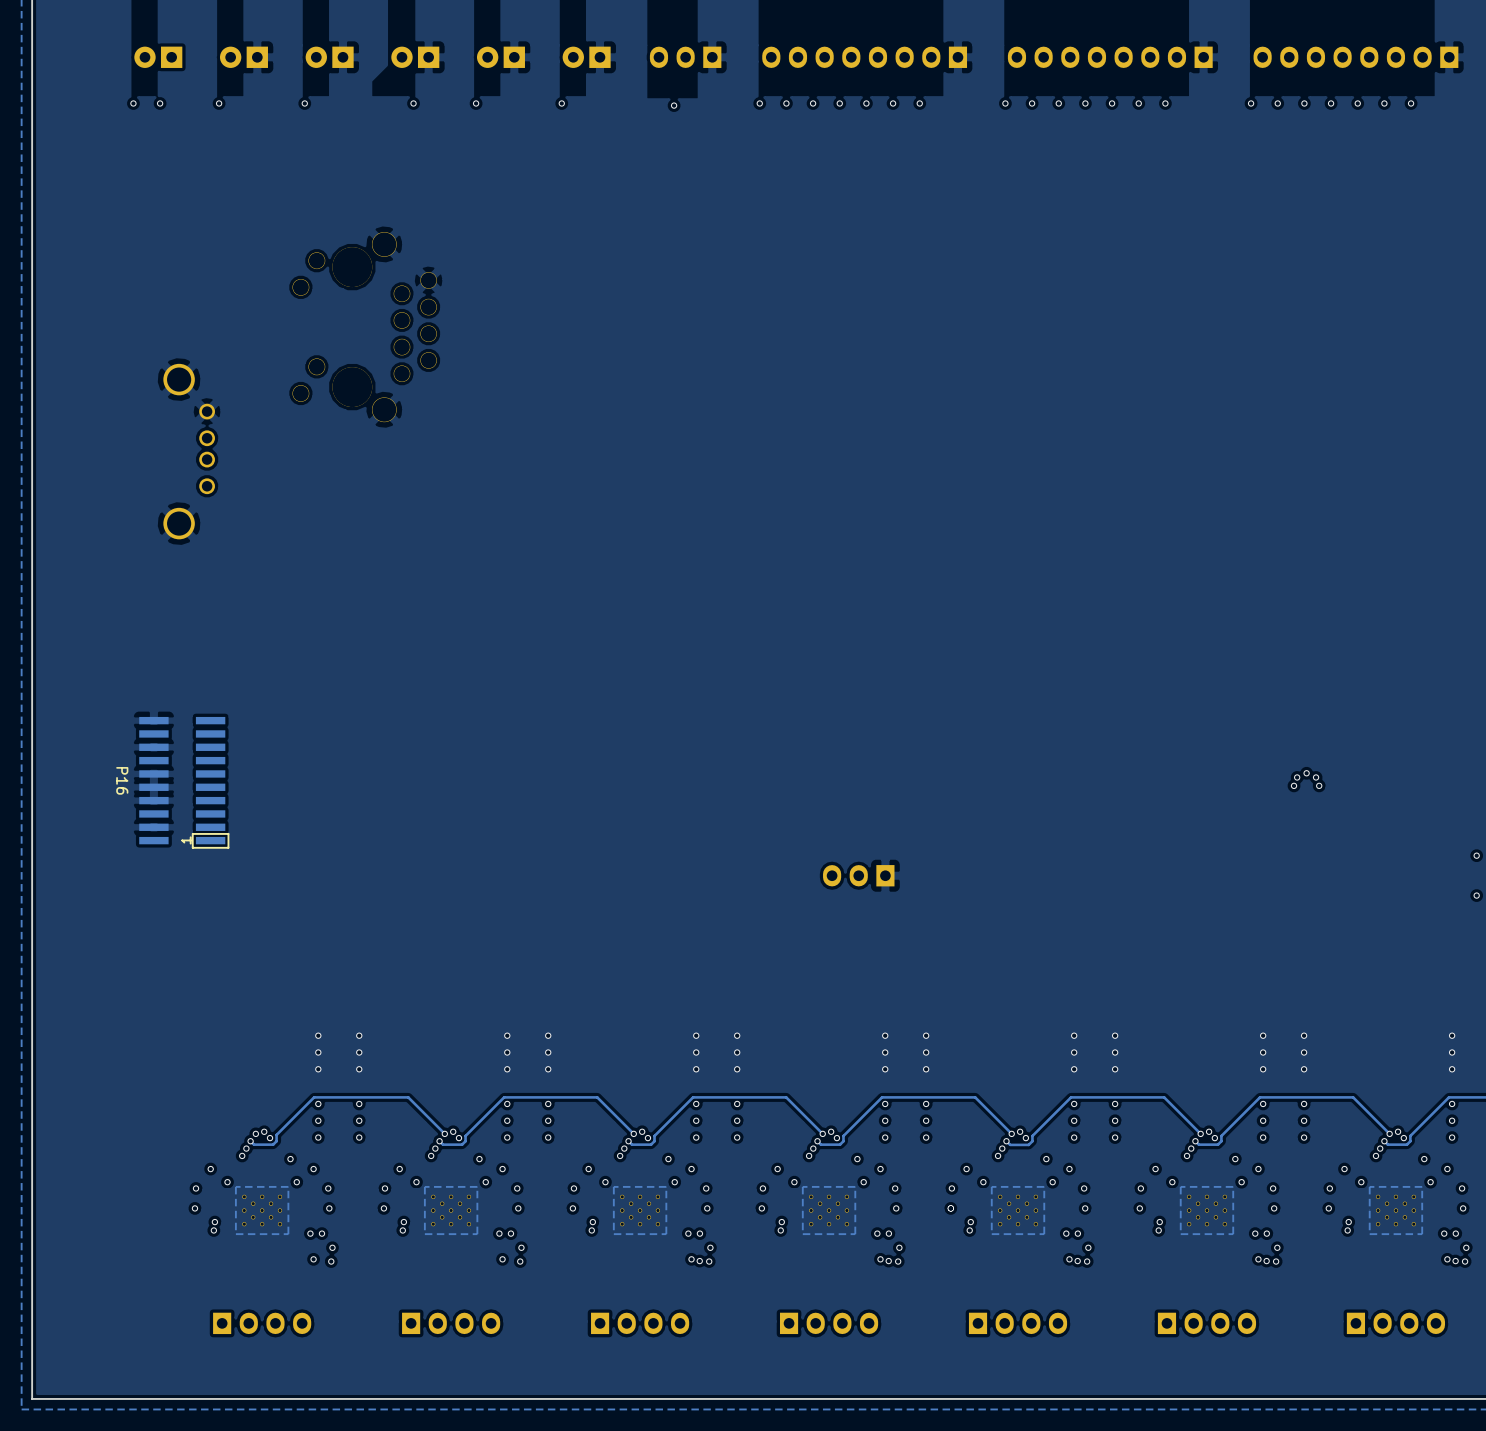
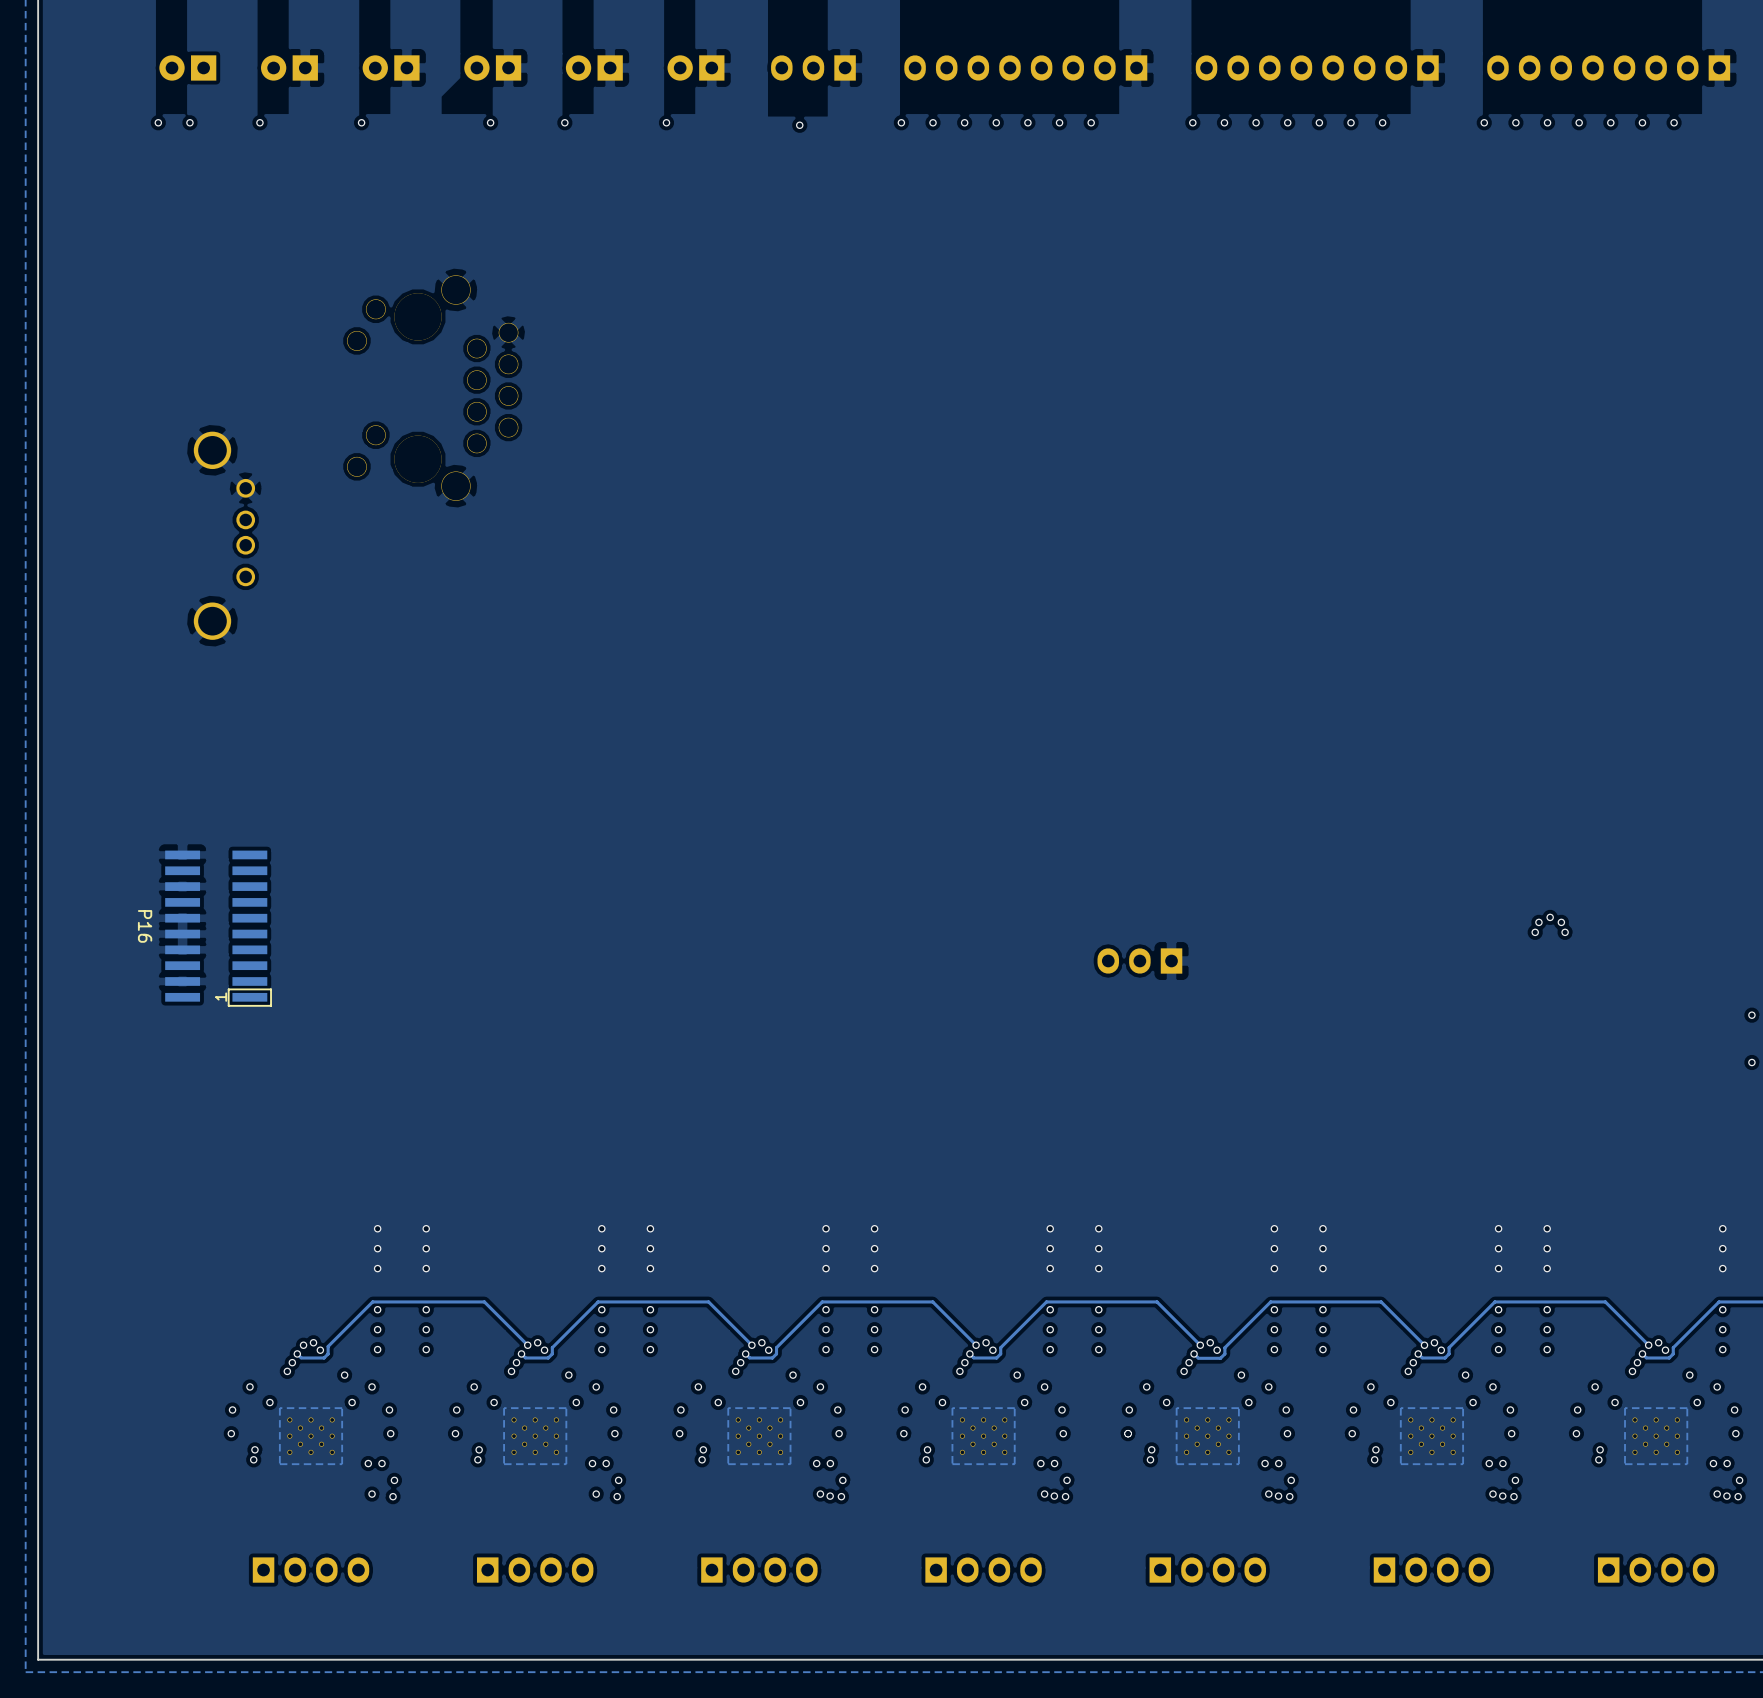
part position: (858, 875) -> (1139, 961)

